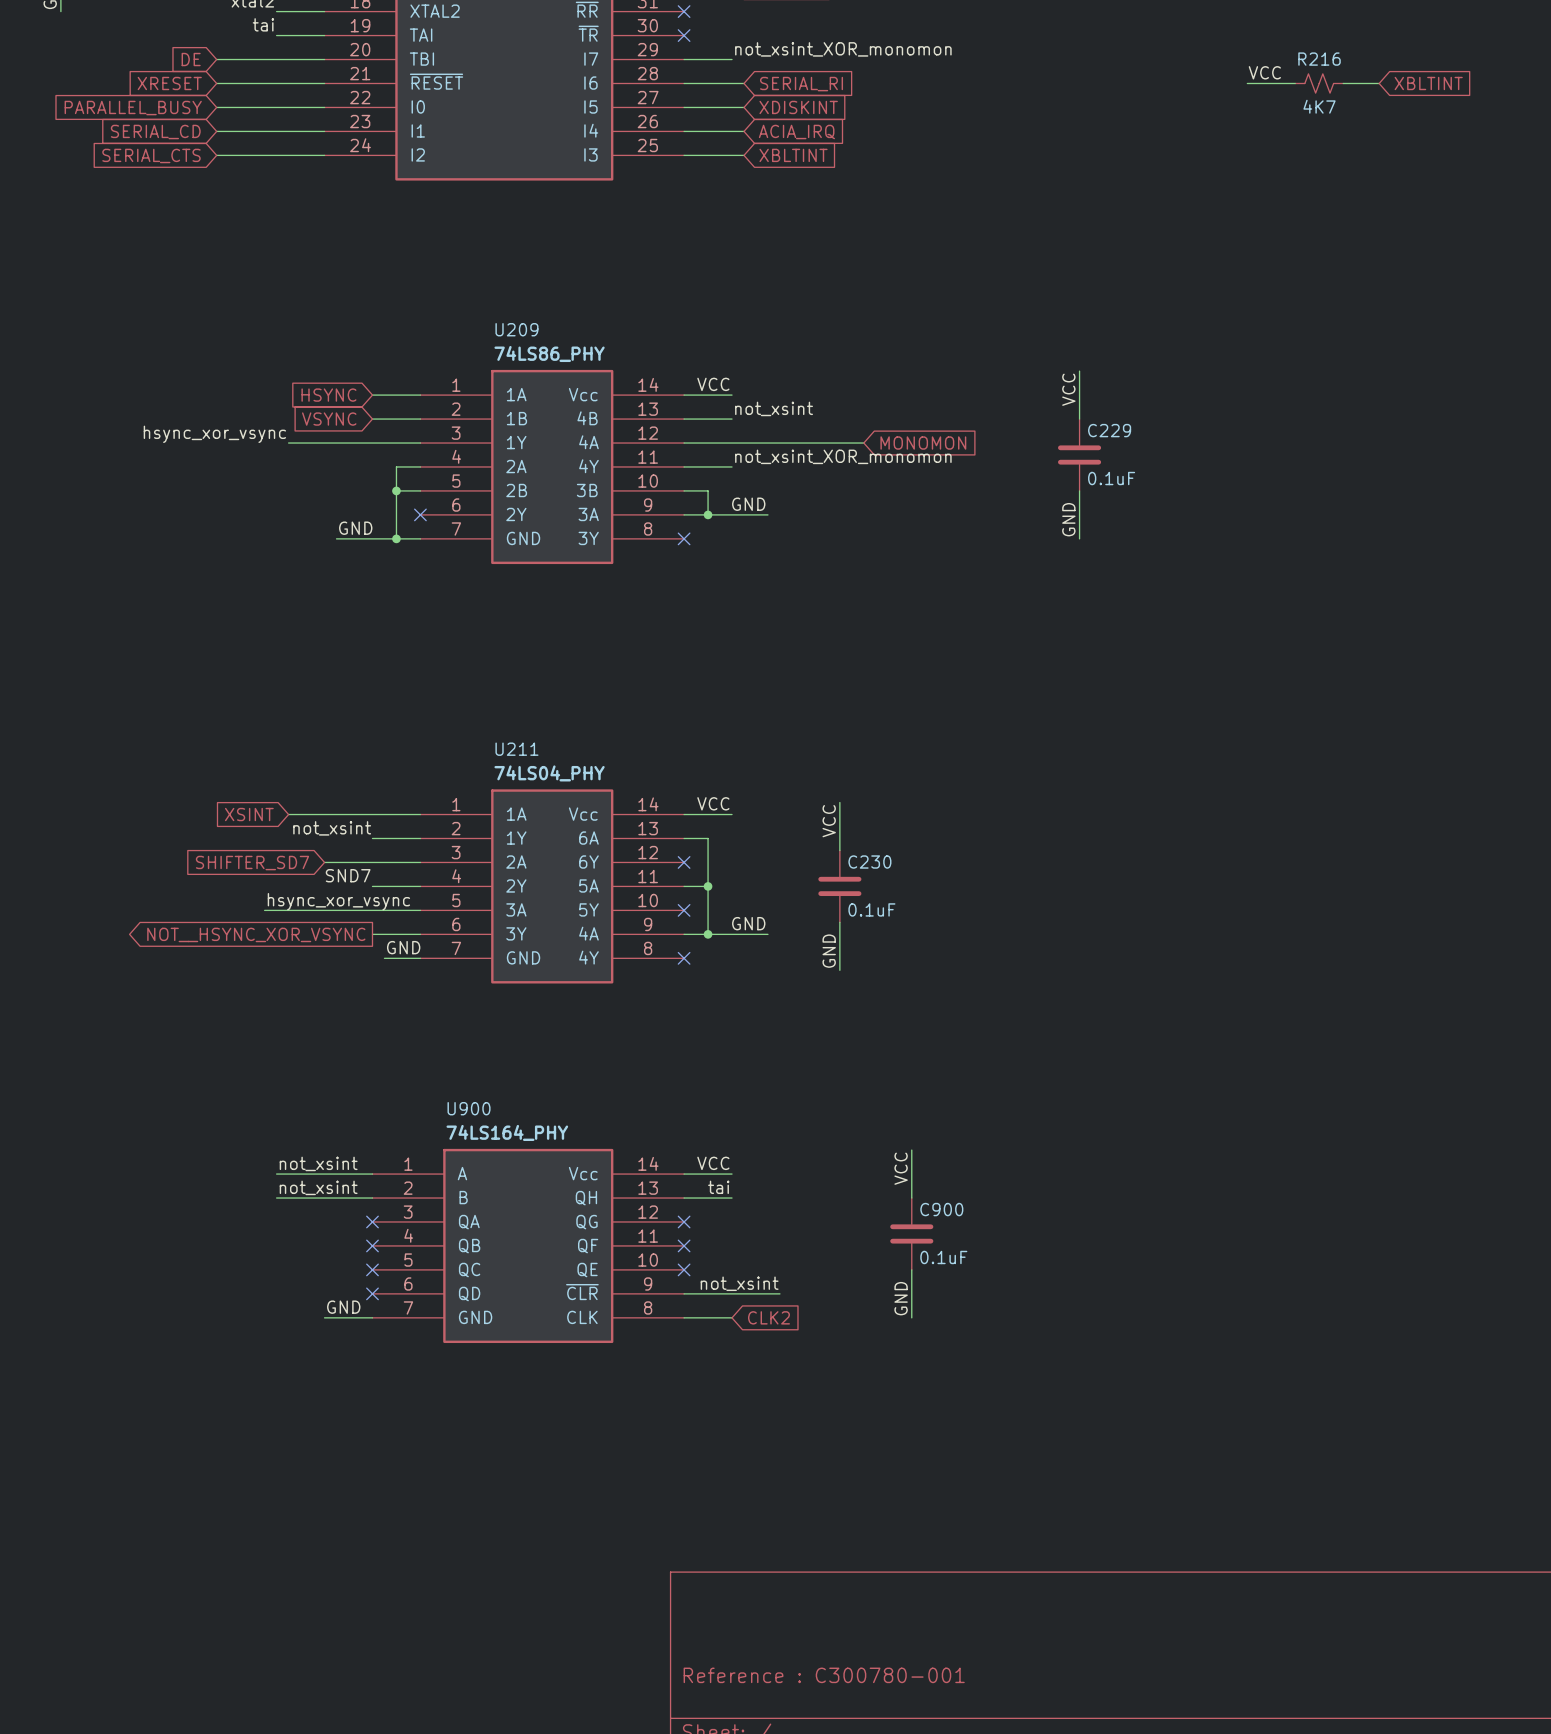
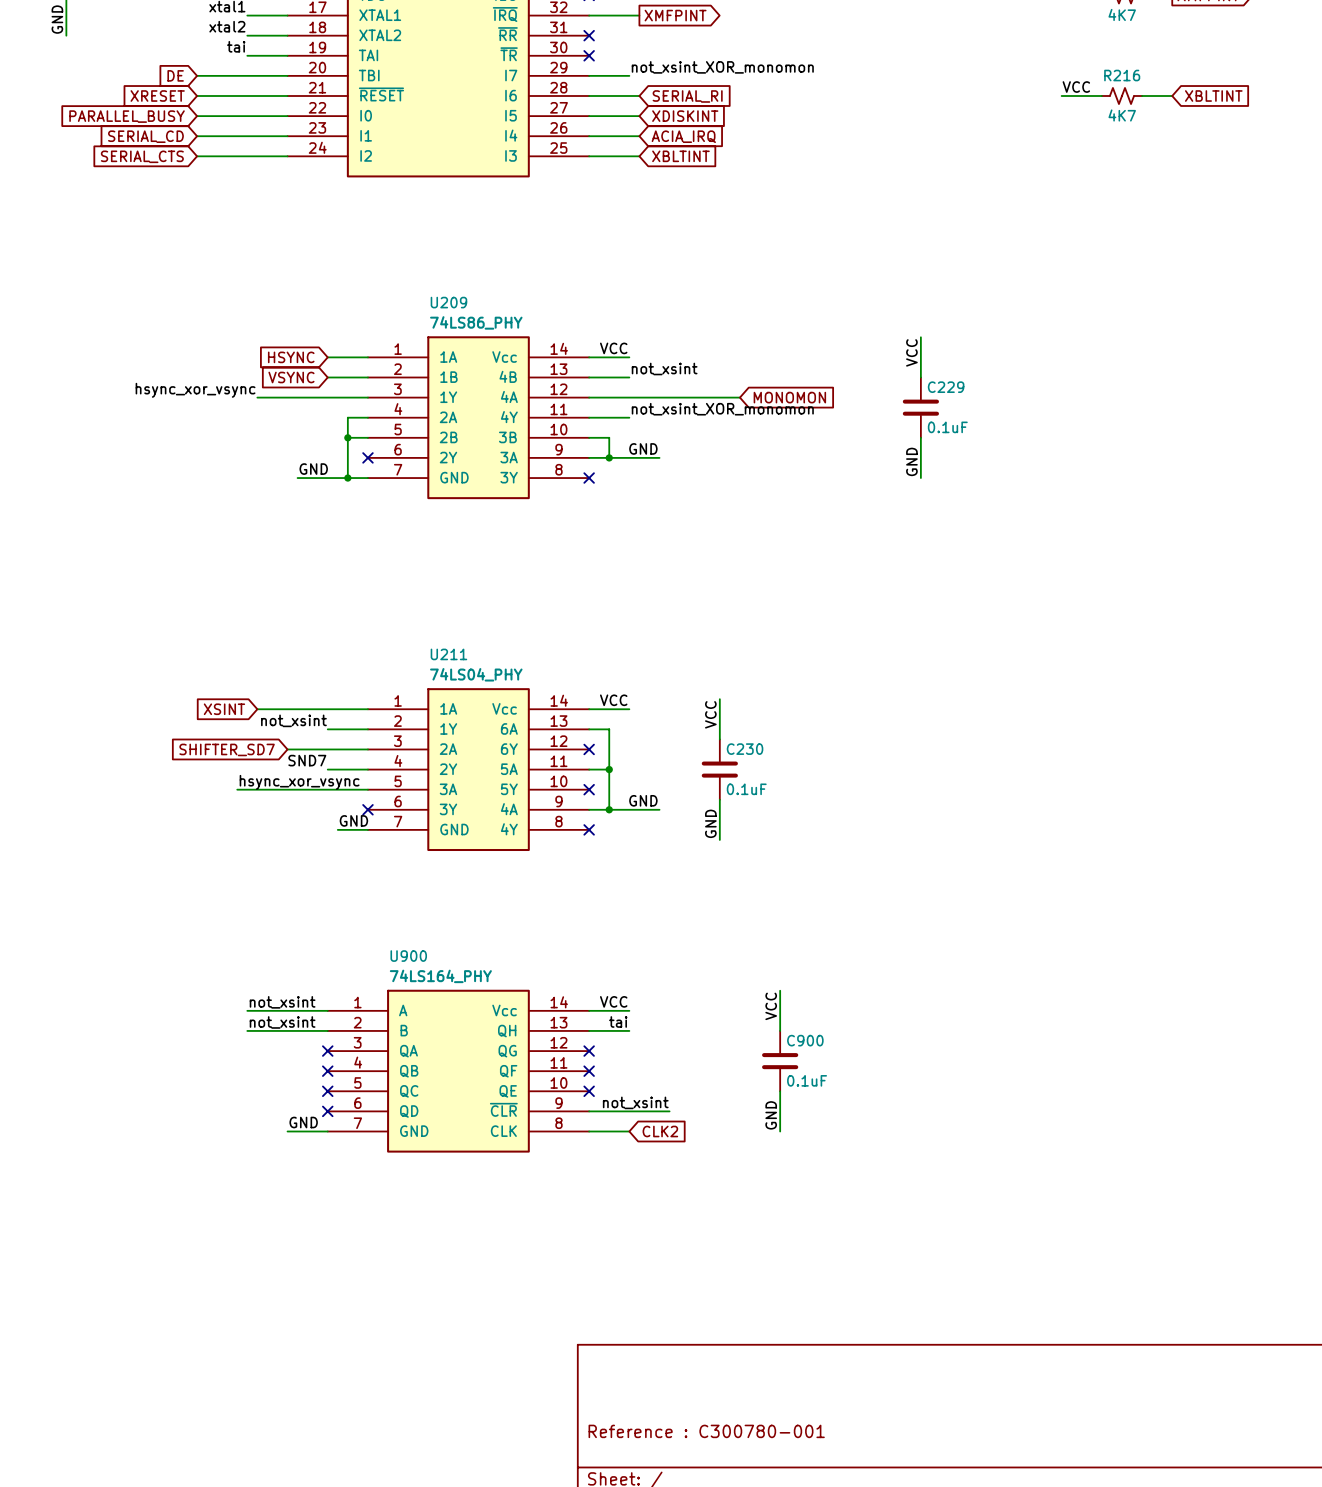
global label: NOT__HSYNC_XOR_VSYNC (256, 934) -> none
wire: (372, 934) (420, 934) -> none
no-connect mark: none -> (367, 809)

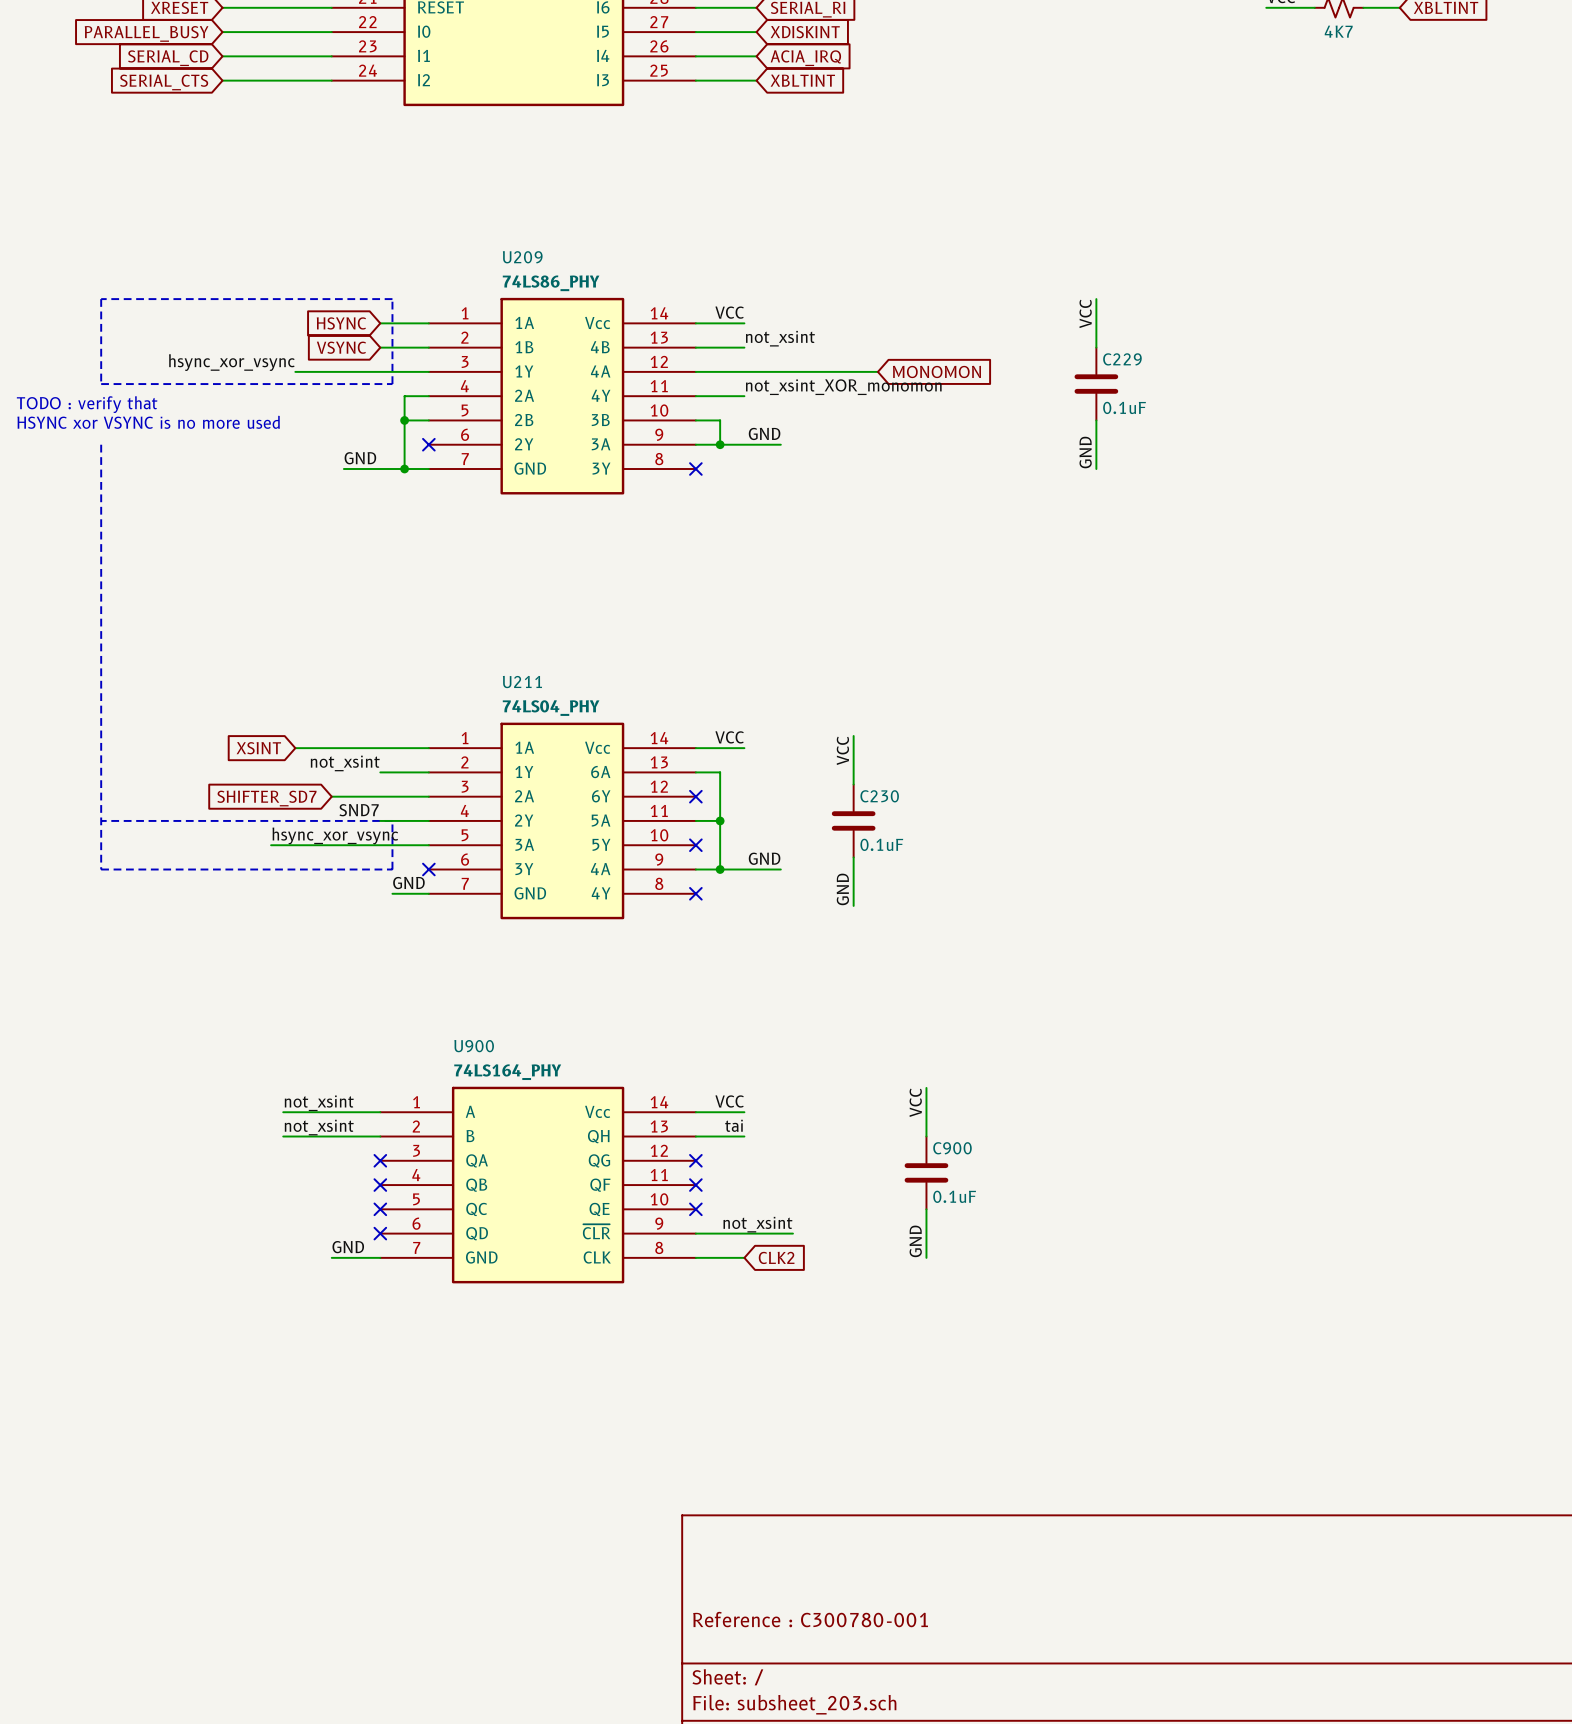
line: none -> (101, 299) (392, 299) (392, 384) (101, 384) (101, 299)
text: none -> TODO : verify that (87, 404)
text: none -> HSYNC xor VSYNC is no more used (148, 422)
line: none -> (101, 444) (101, 869) (392, 869) (392, 820) (101, 820)

